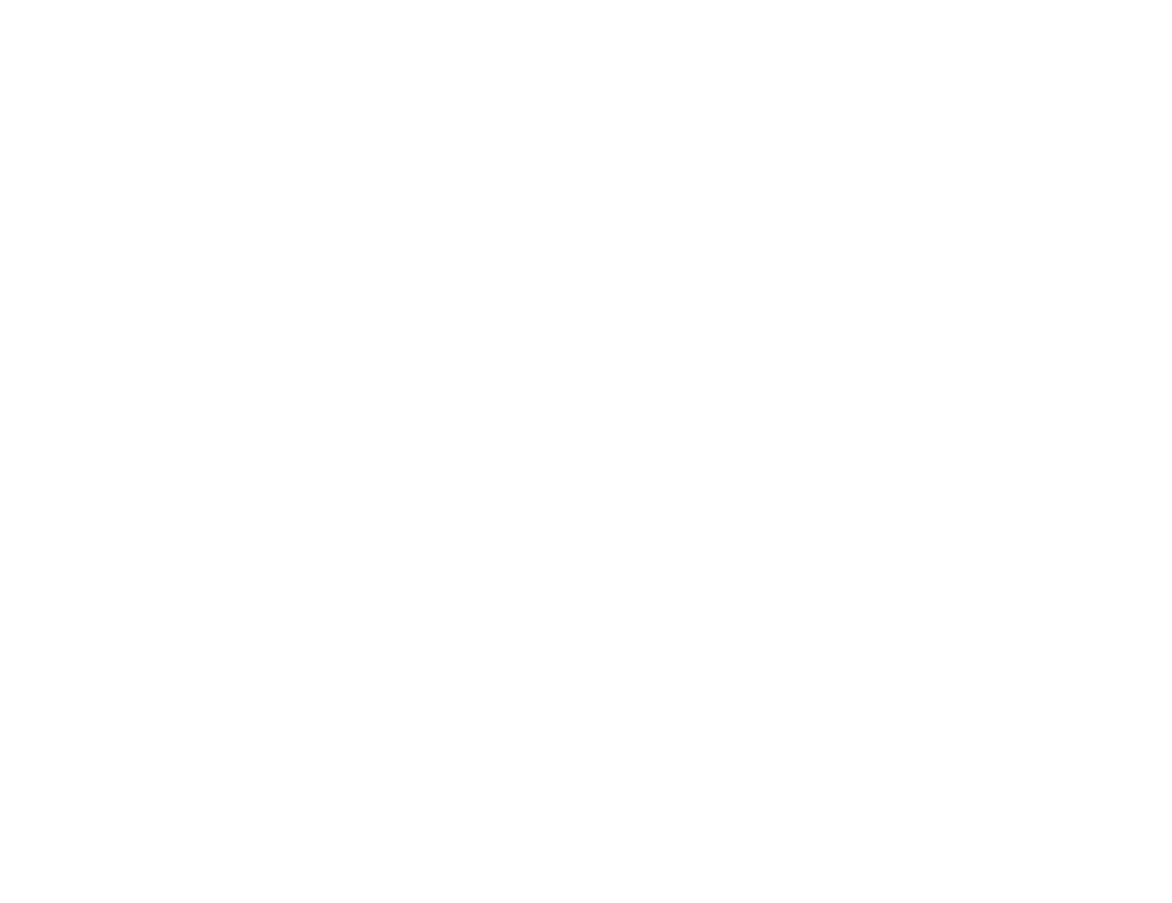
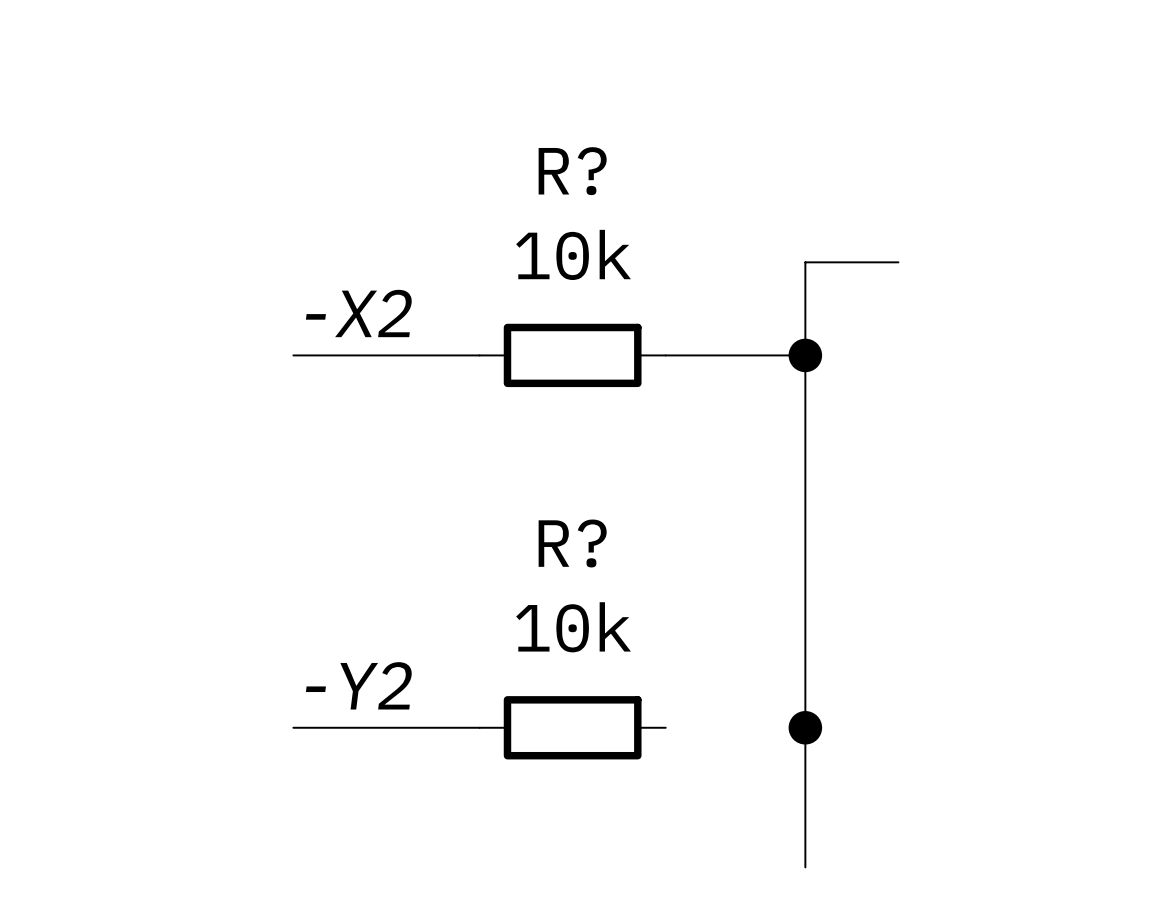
wire: none -> (898, 262) (805, 262) (805, 867)
label: none -> -X2 (358, 313)
wire: none -> (293, 355) (479, 355)
R?: none -> 10k (572, 355)
wire: none -> (665, 355) (805, 355)
junction: none -> (805, 355)
label: none -> -Y2 (358, 685)
wire: none -> (293, 727) (479, 727)
R?: none -> 10k (572, 727)
junction: none -> (805, 727)

